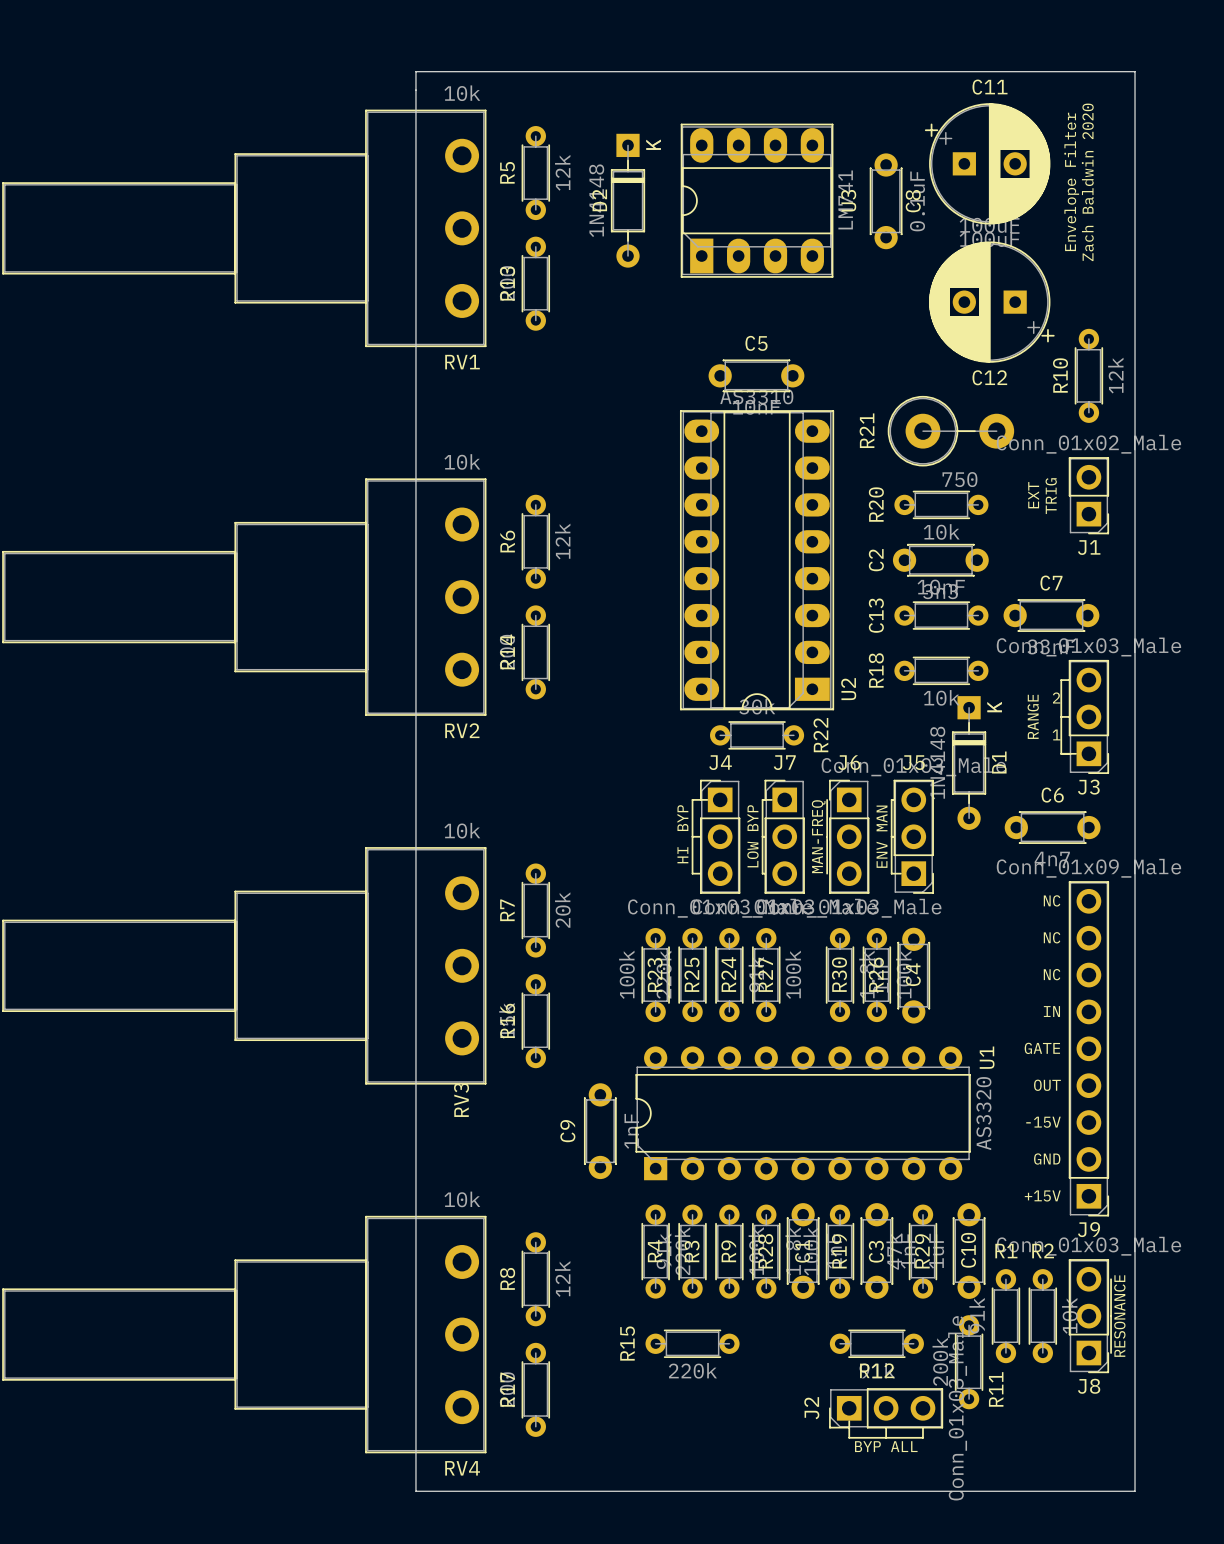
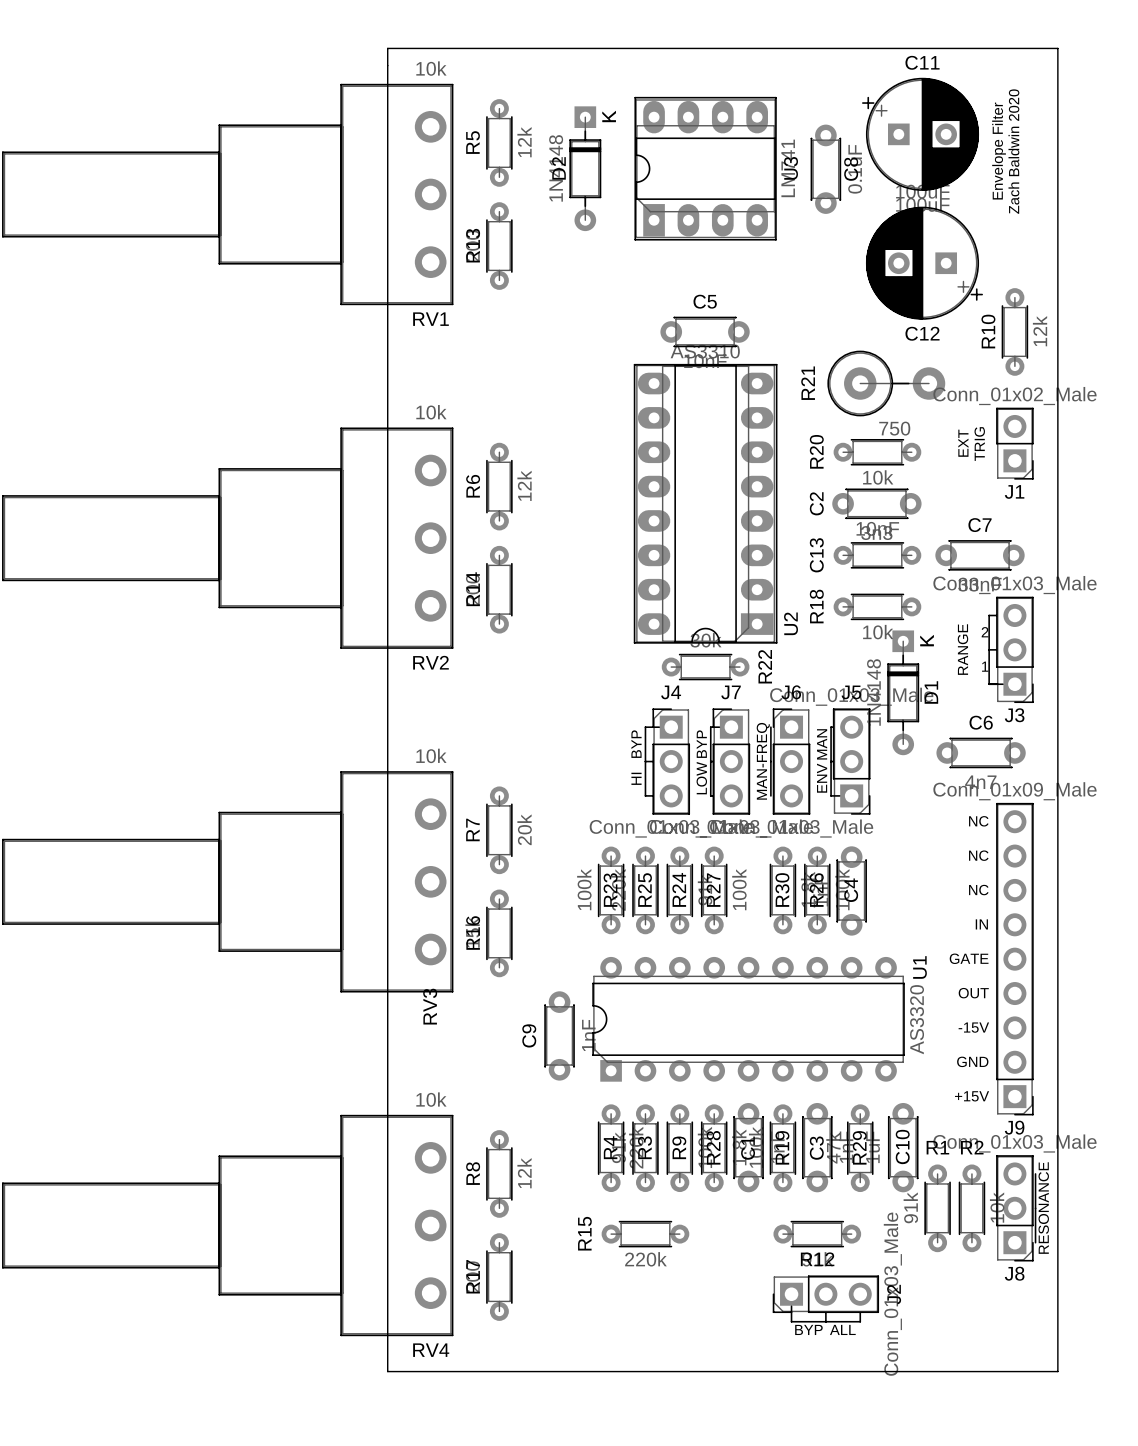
R11: 200k (969, 1362) -> none
J2 name position: J2 (811, 1408) -> J2 (894, 1294)

